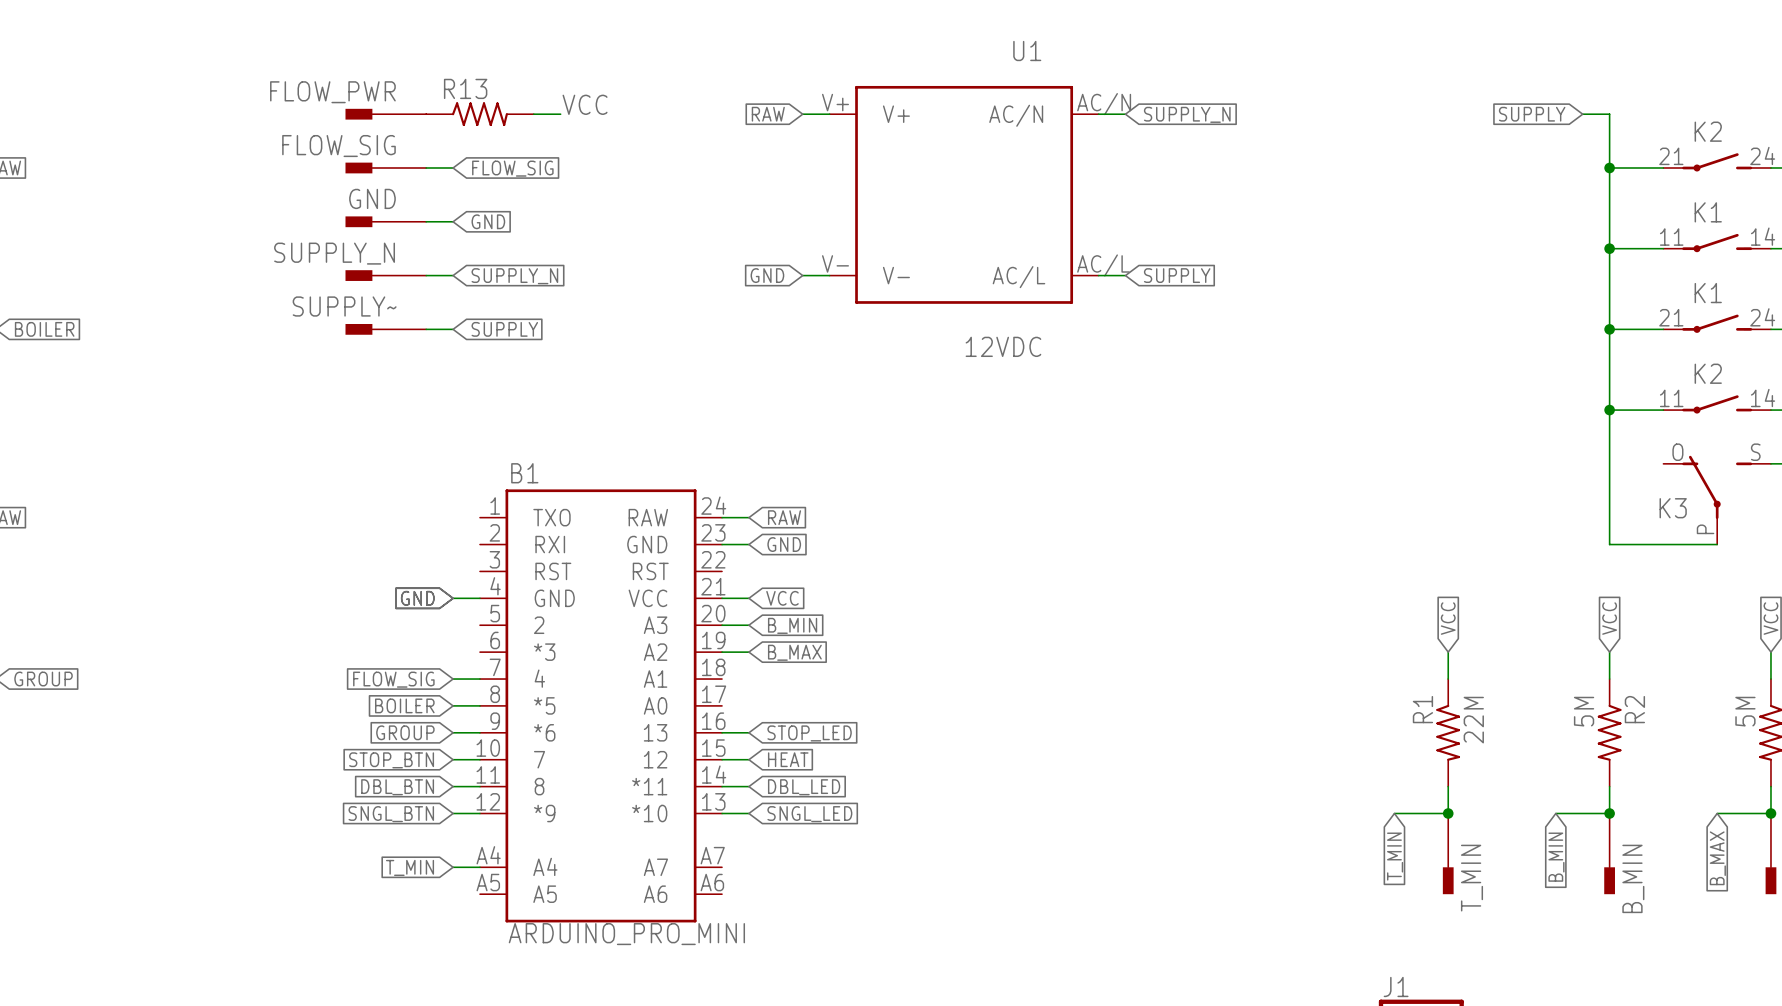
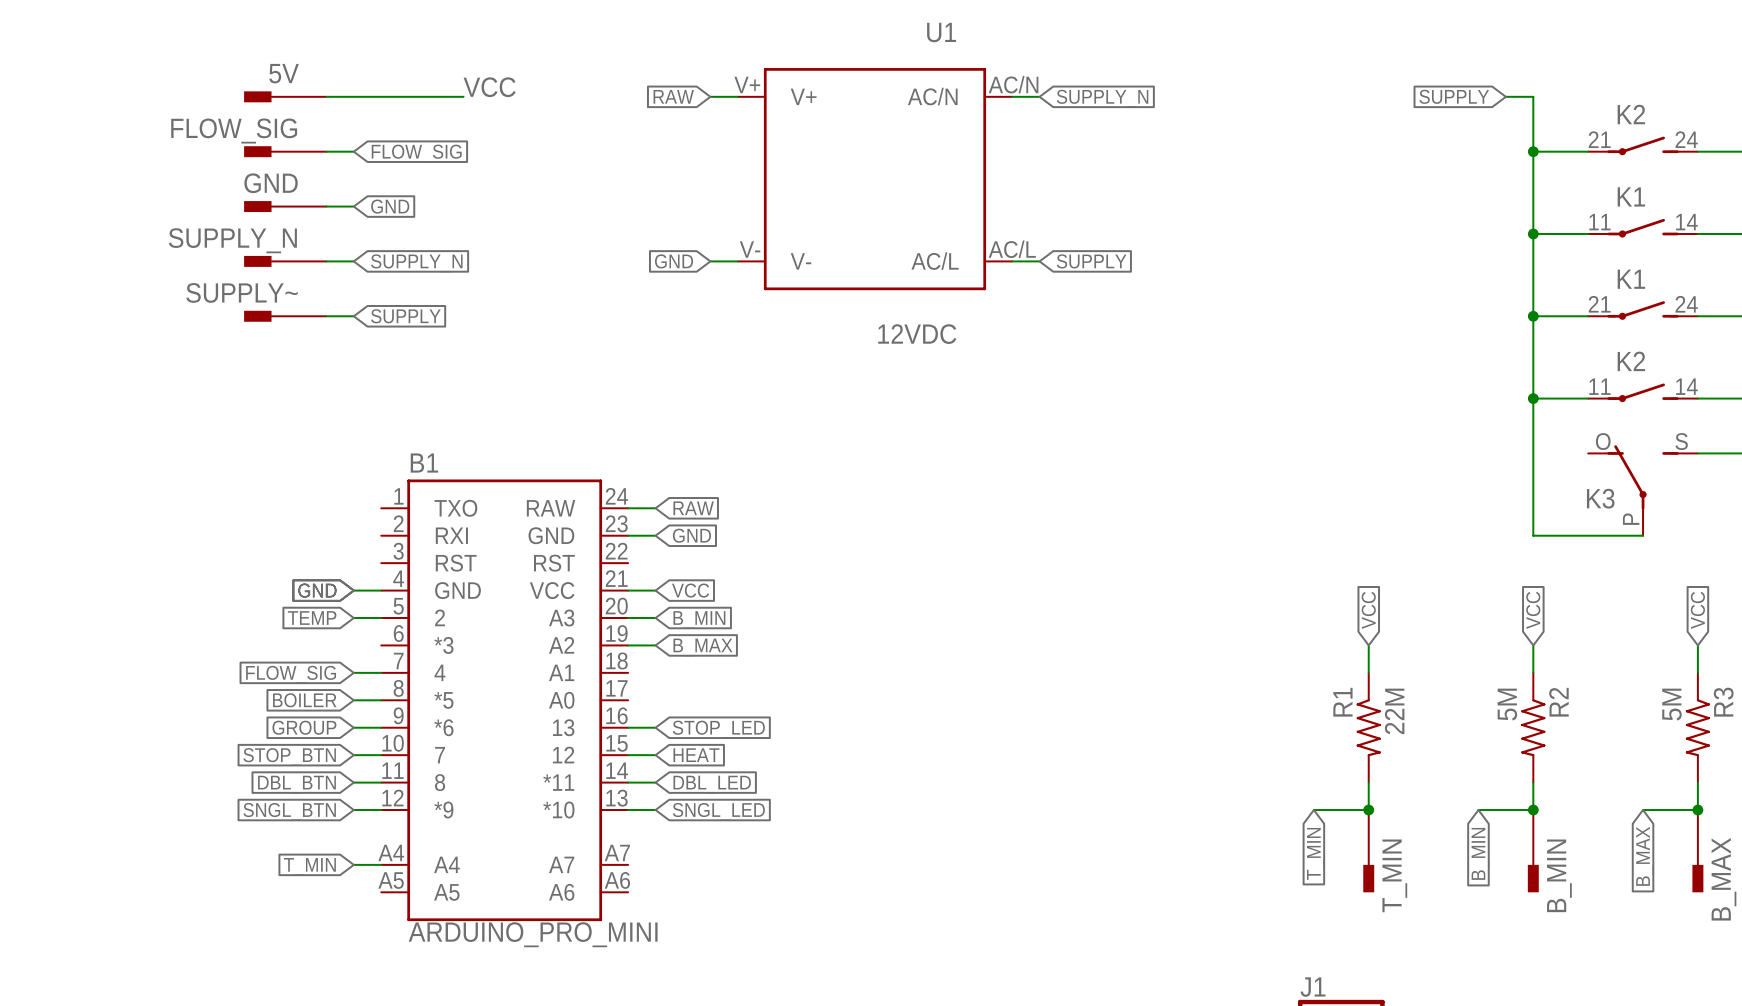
FLOW_PWR name: FLOW_PWR (332, 92) -> 5V (284, 73)
R13: (479, 114) -> none
global label: none -> TEMP (312, 618)
wire: none -> (353, 618) (381, 618)

